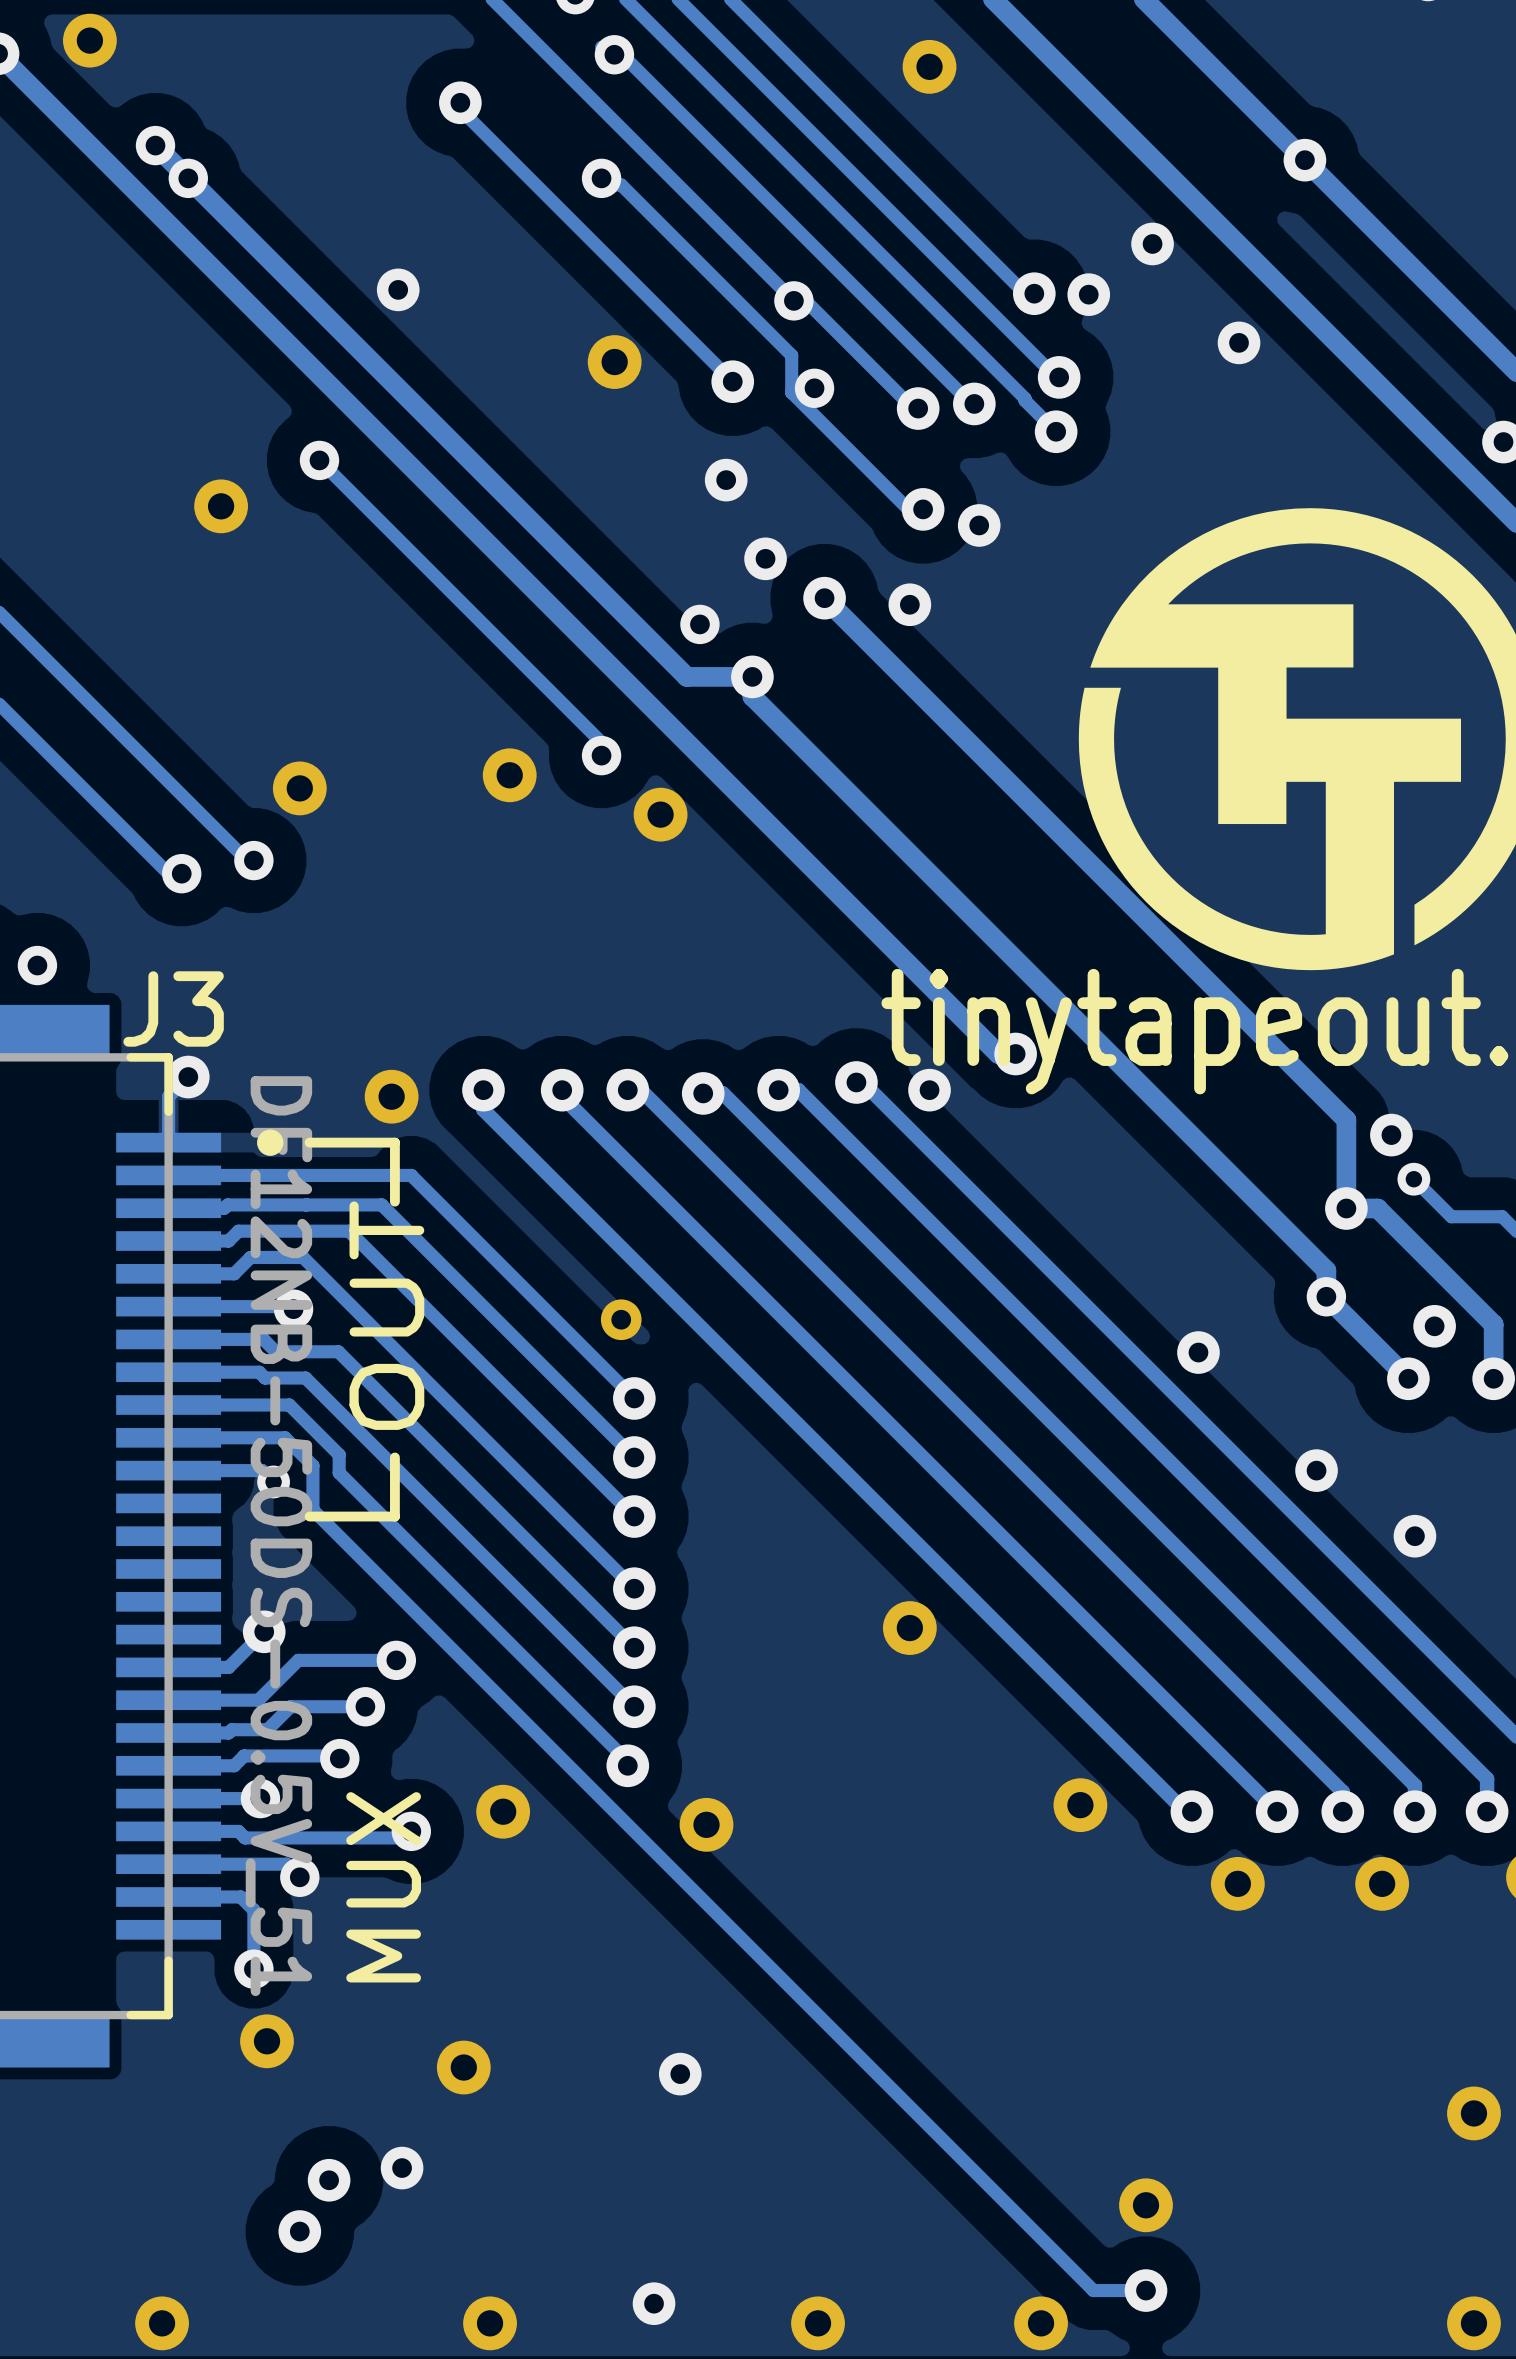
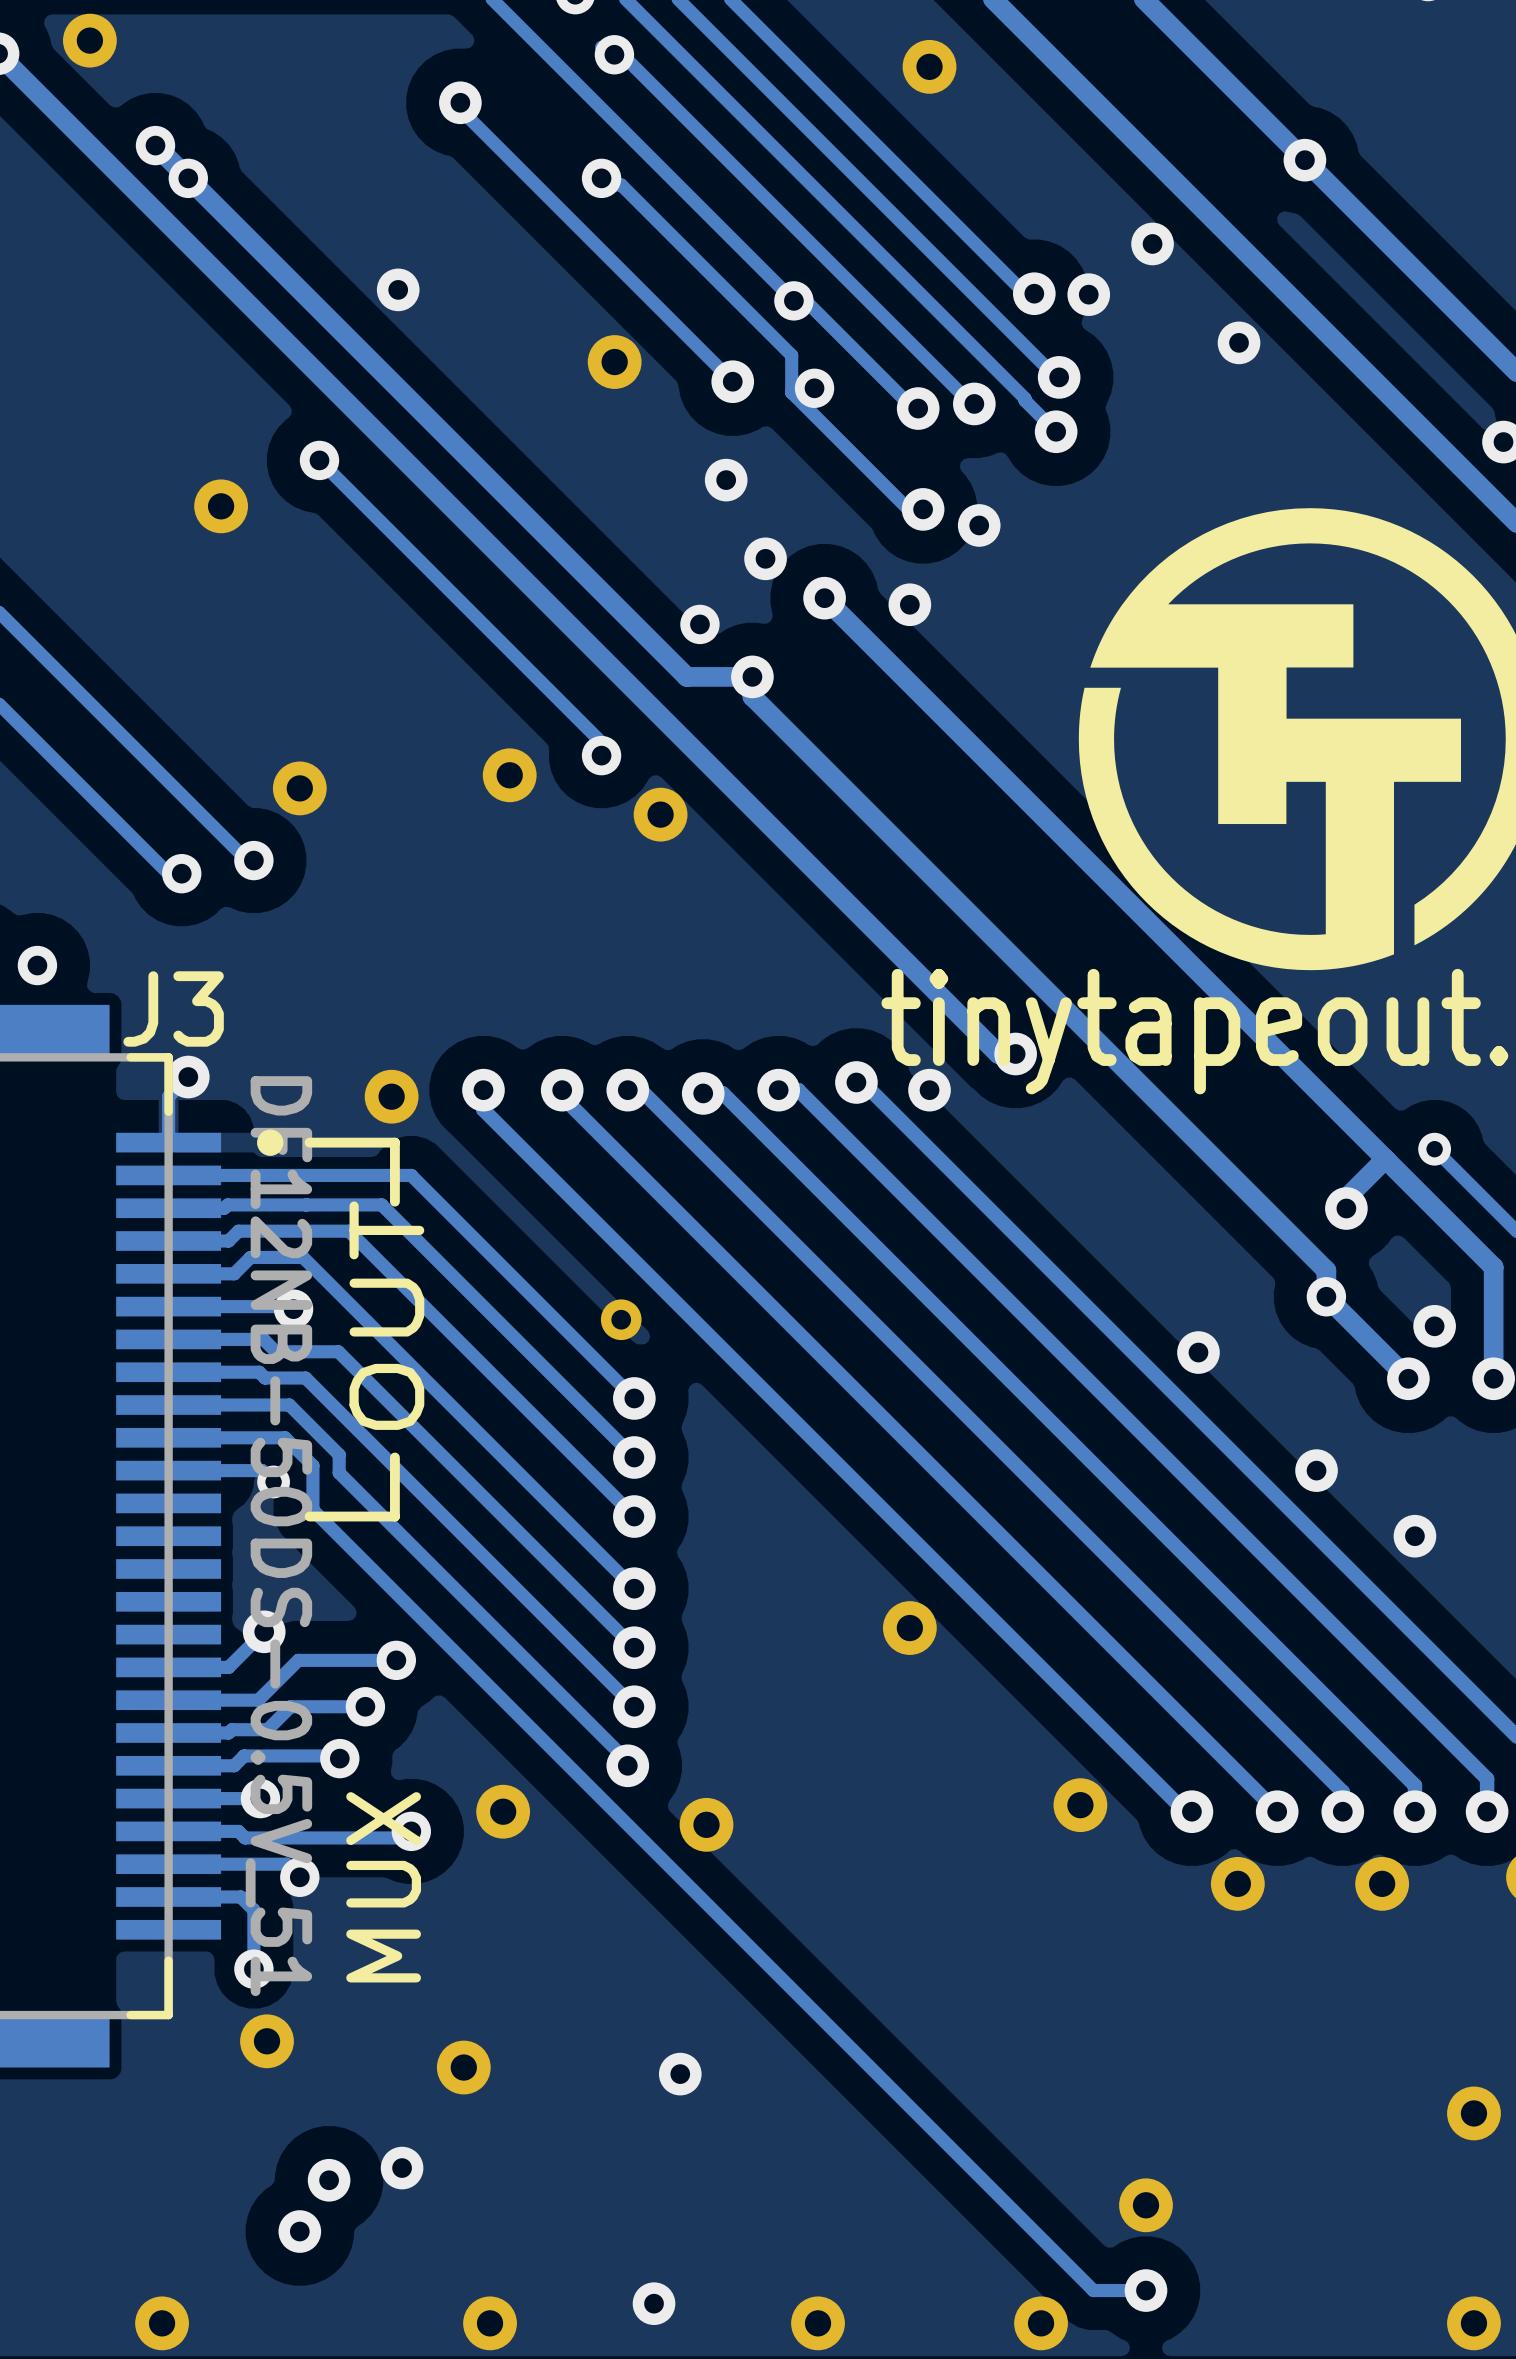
track: (1346, 1120) (1346, 1198) -> (1385, 1159) (1346, 1198)
via: (1391, 1135) -> none
track: (1413, 1179) (1451, 1216) (1502, 1216) -> (1434, 1149) (1502, 1216)
via position: (1413, 1179) -> (1434, 1149)
track: (1346, 1208) (1377, 1208) (1493, 1324) -> (1346, 1120) (1493, 1267) (1493, 1324)

